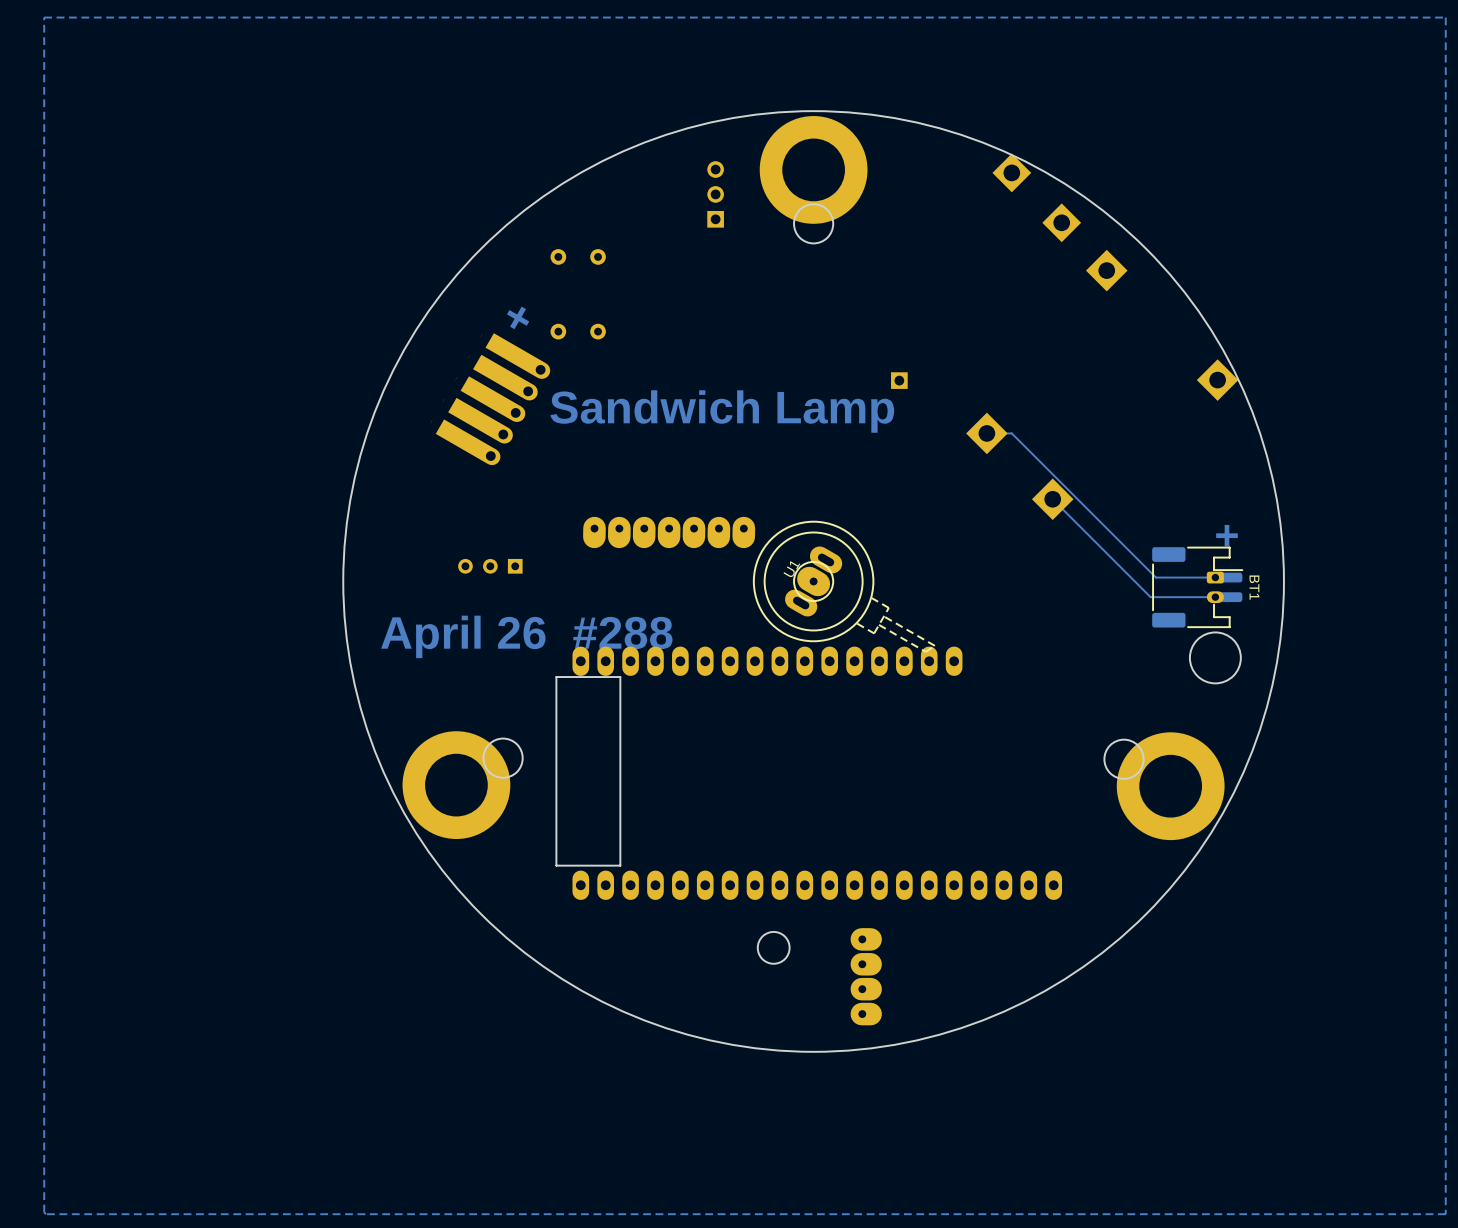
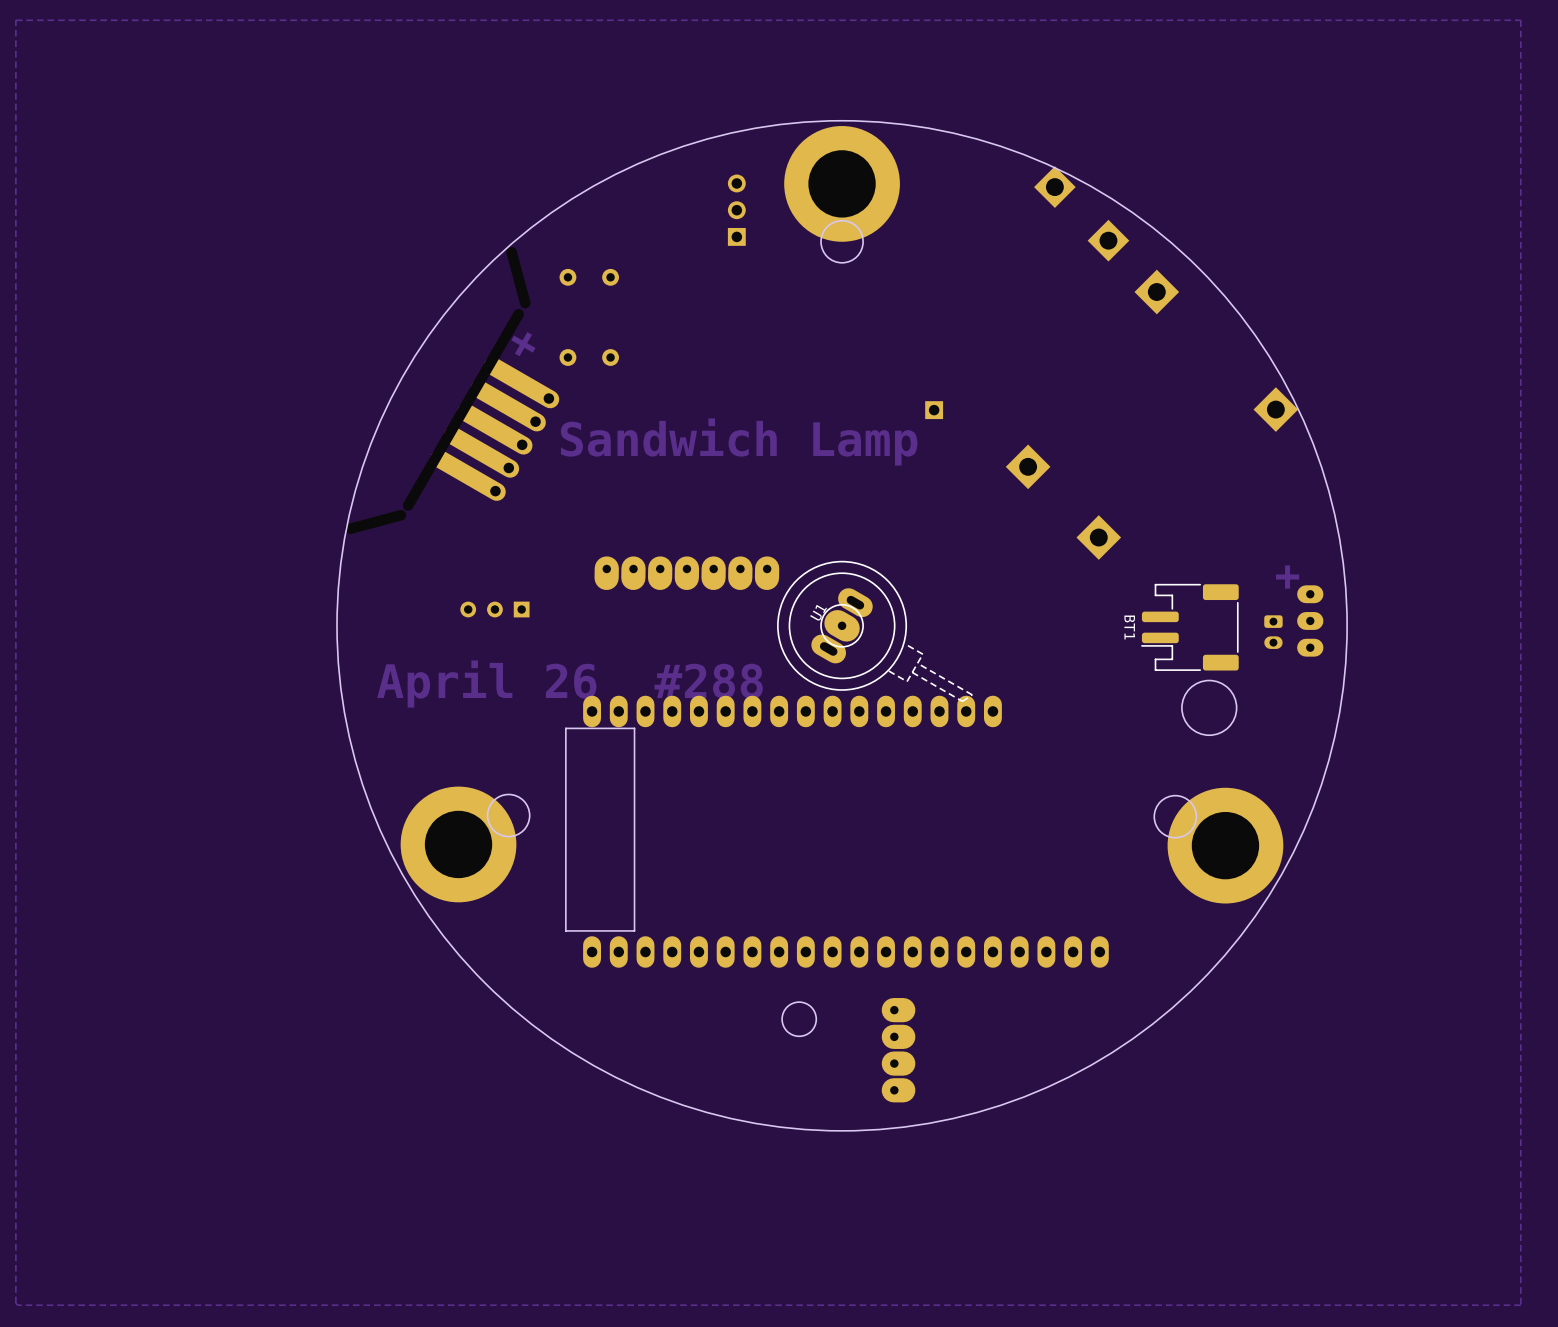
track: (986, 433) (1011, 433) (1155, 577) (1215, 577) -> none
track: (1052, 499) (1150, 597) (1215, 597) -> none
part: none -> (1310, 620)
BT1 rotation: 0° (1197, 587) -> 180° (1190, 627)
BT1 position: (1197, 587) -> (1190, 627)
round board edge position: (1215, 657) -> (1209, 707)

